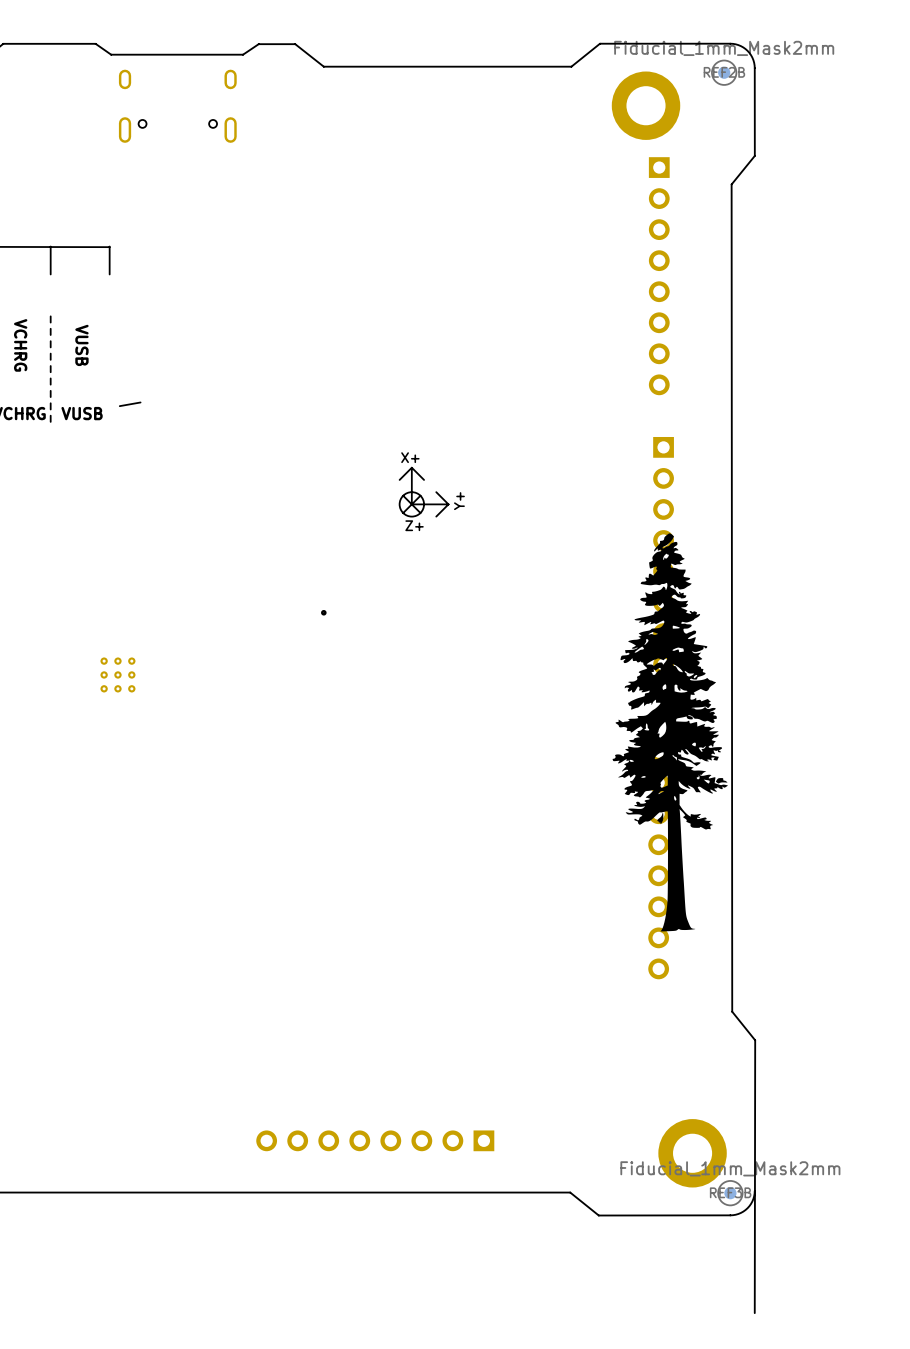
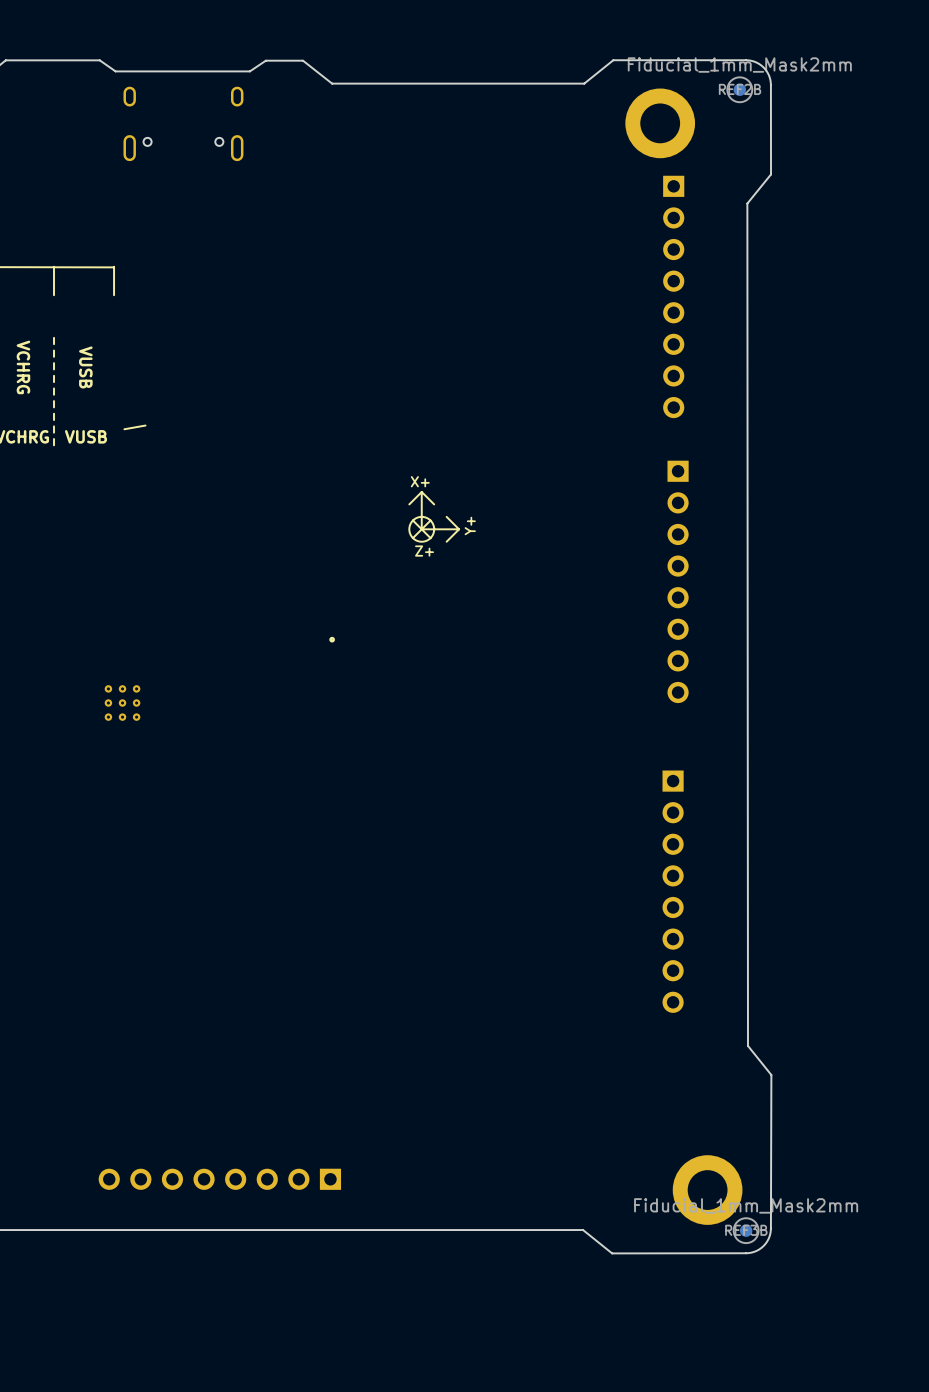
drawing: [612, 533, 728, 932] -> none
board edge: (755, 1040) (754, 1313) -> (771, 1075) (770, 1228)
part position: (375, 1140) -> (219, 1179)

